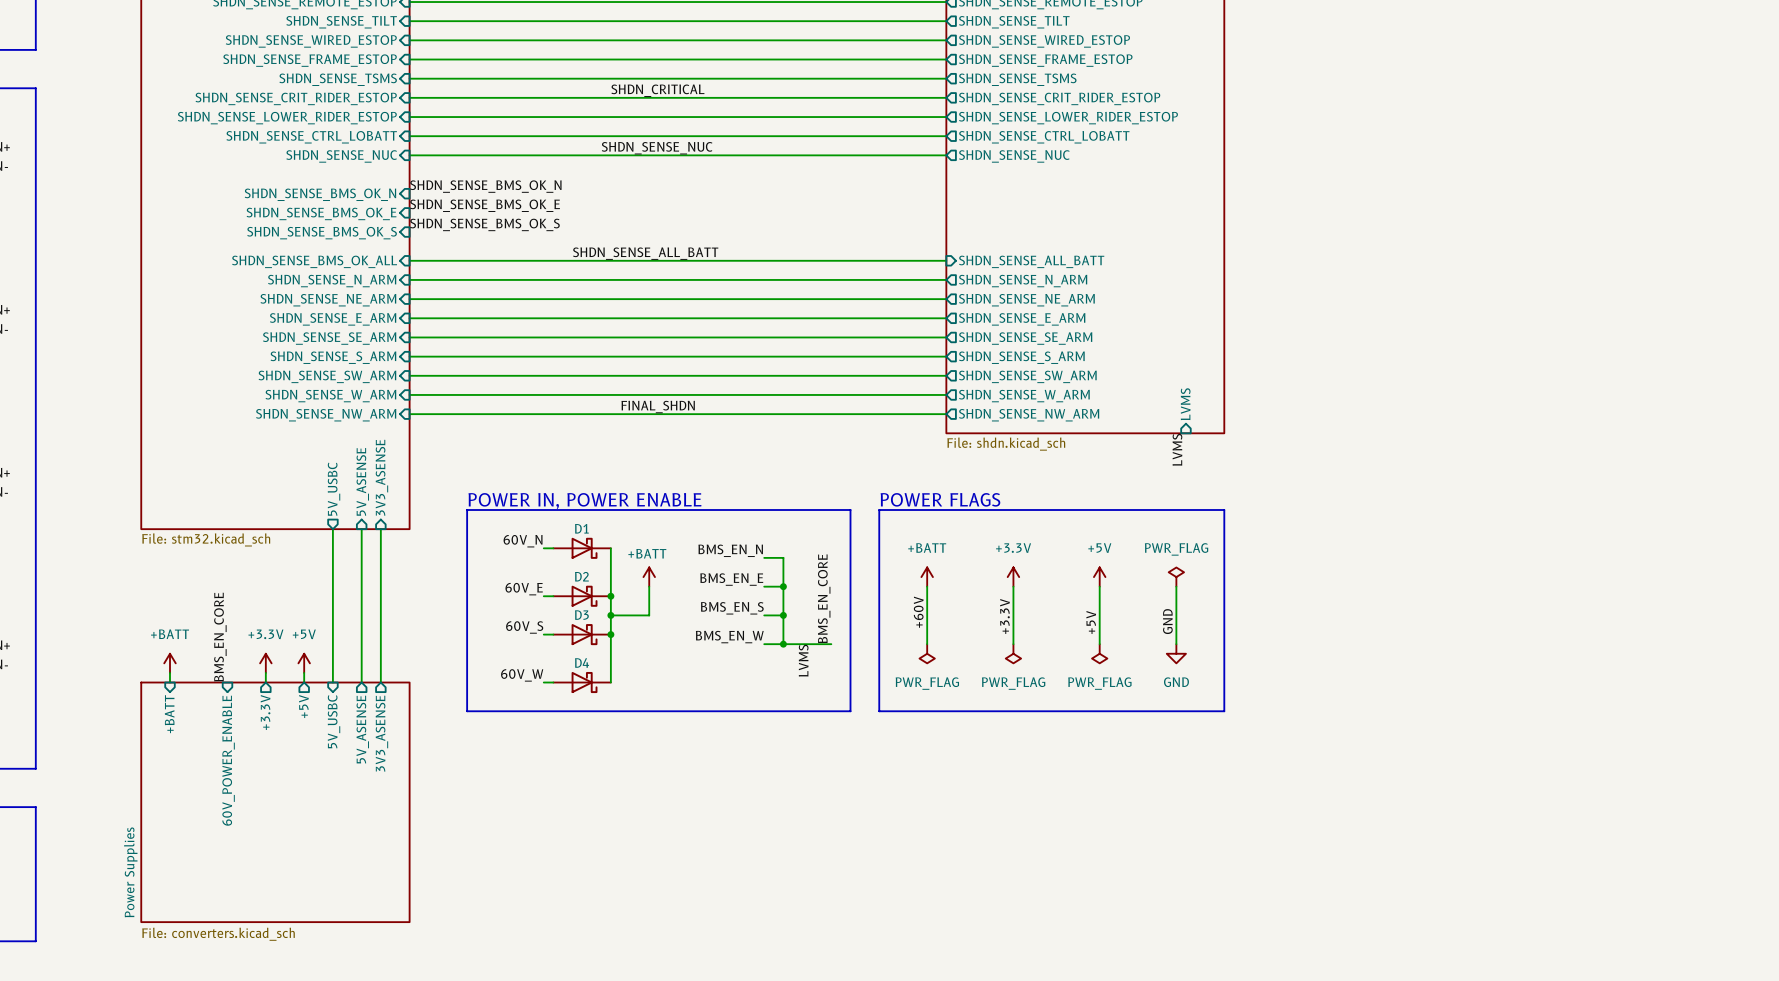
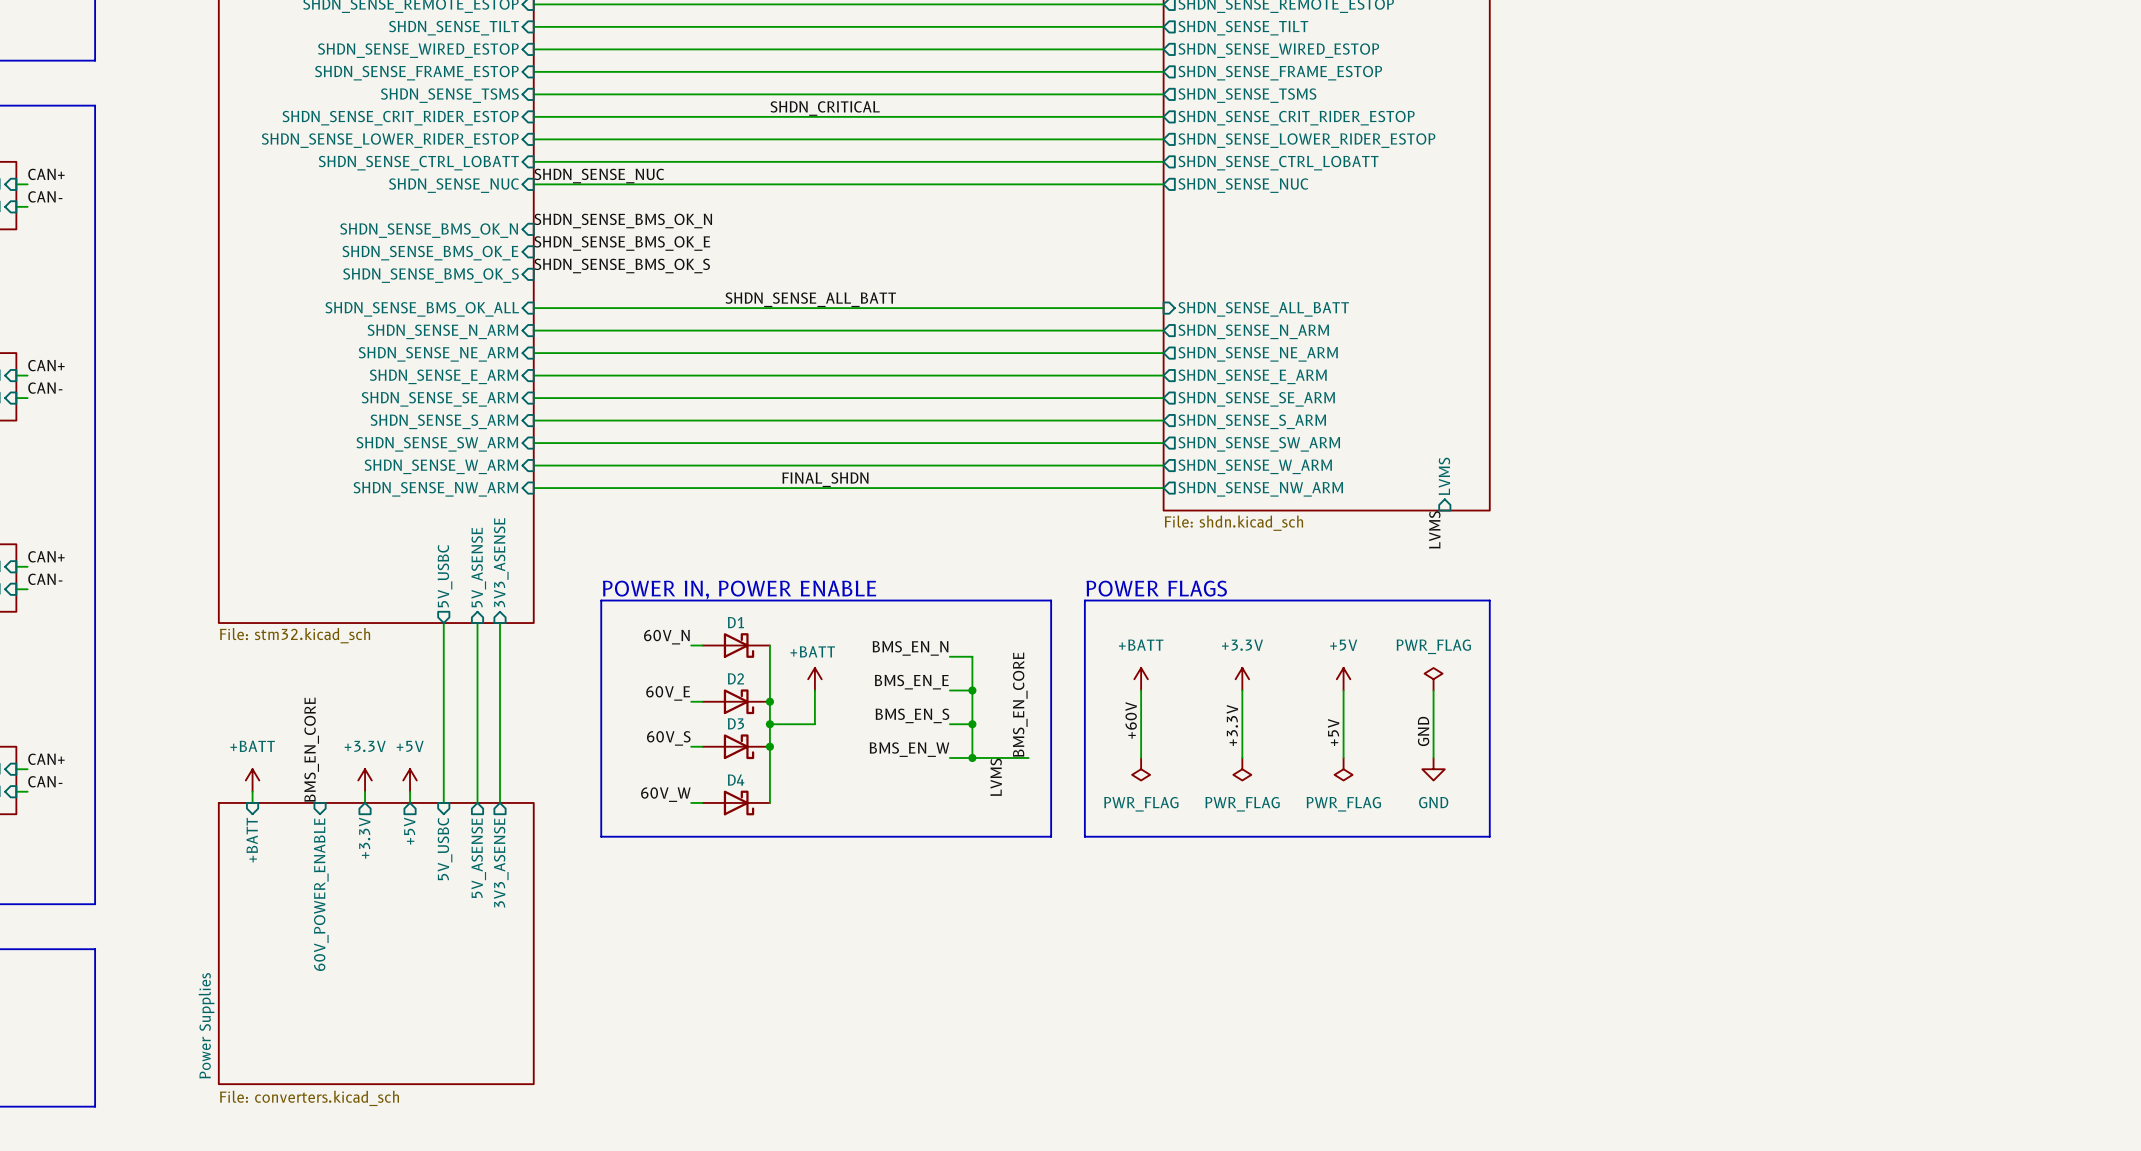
label: none -> SHDN_SENSE_NUC (599, 176)
label: SHDN_SENSE_NUC (657, 148) -> none

